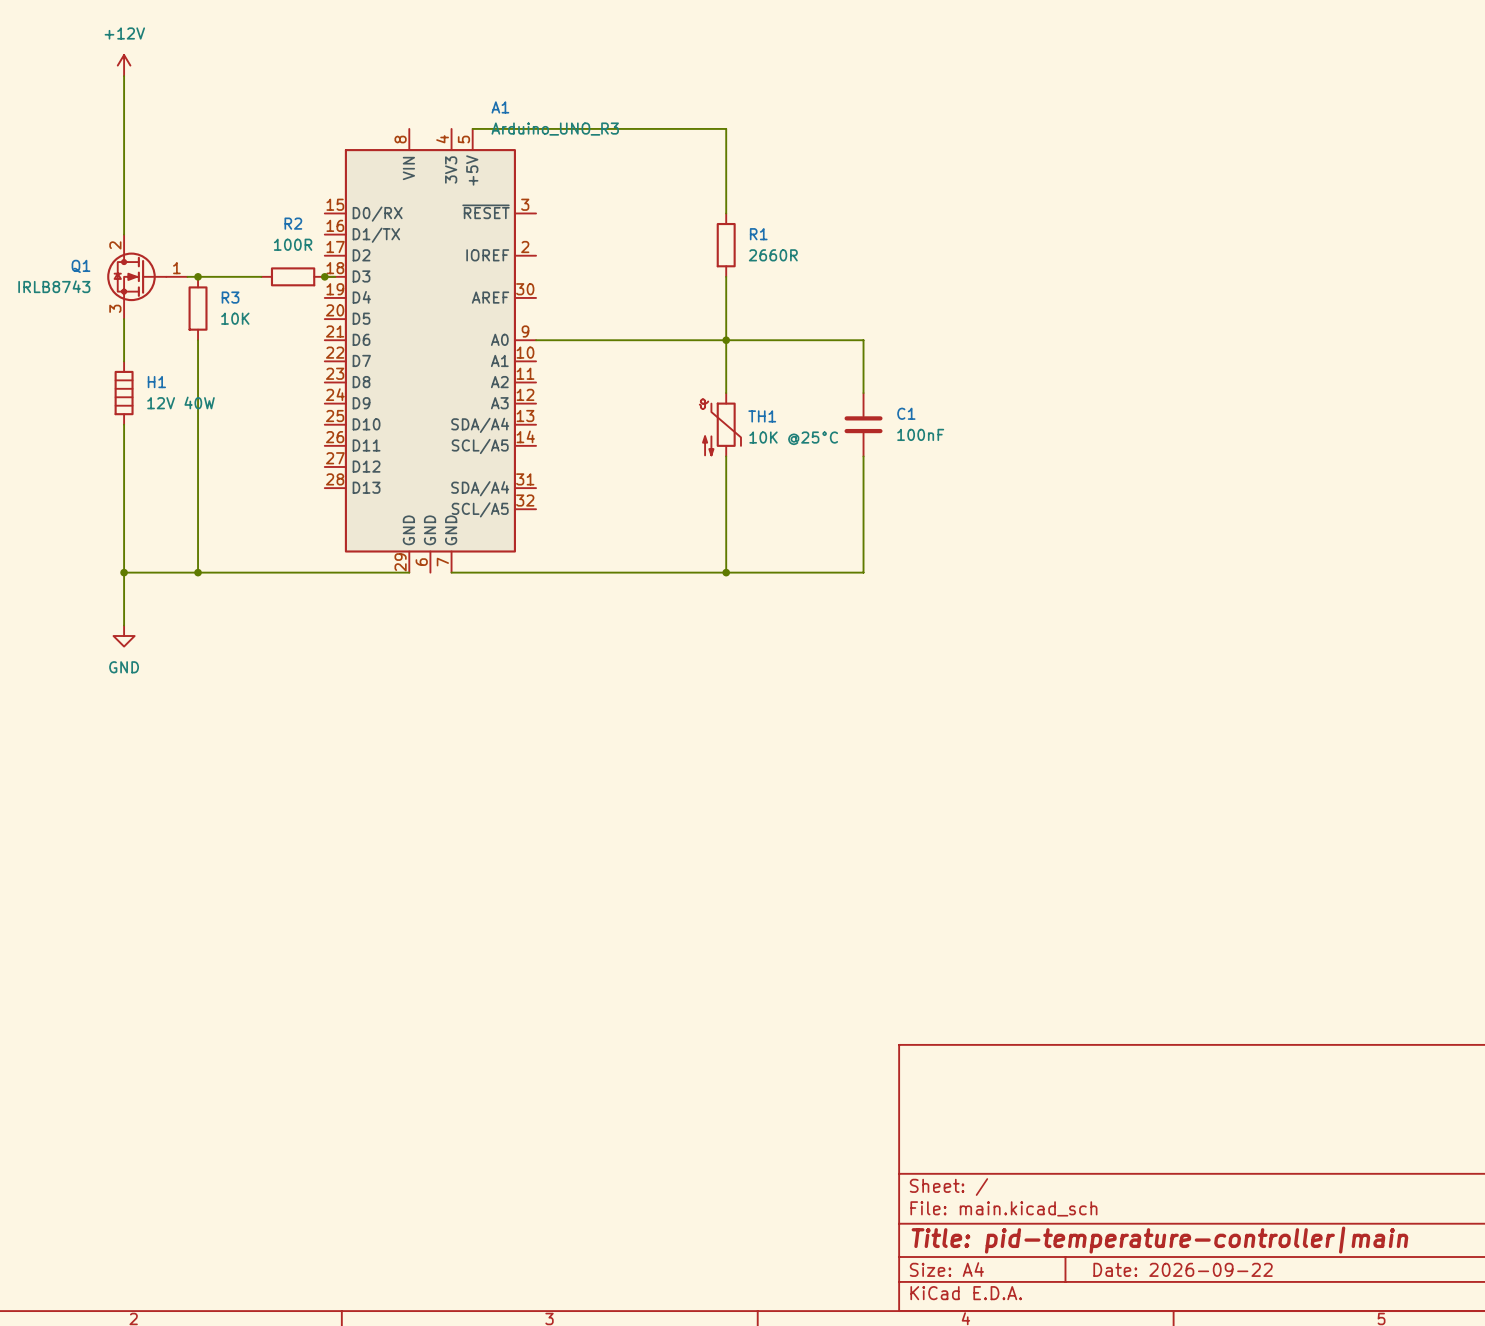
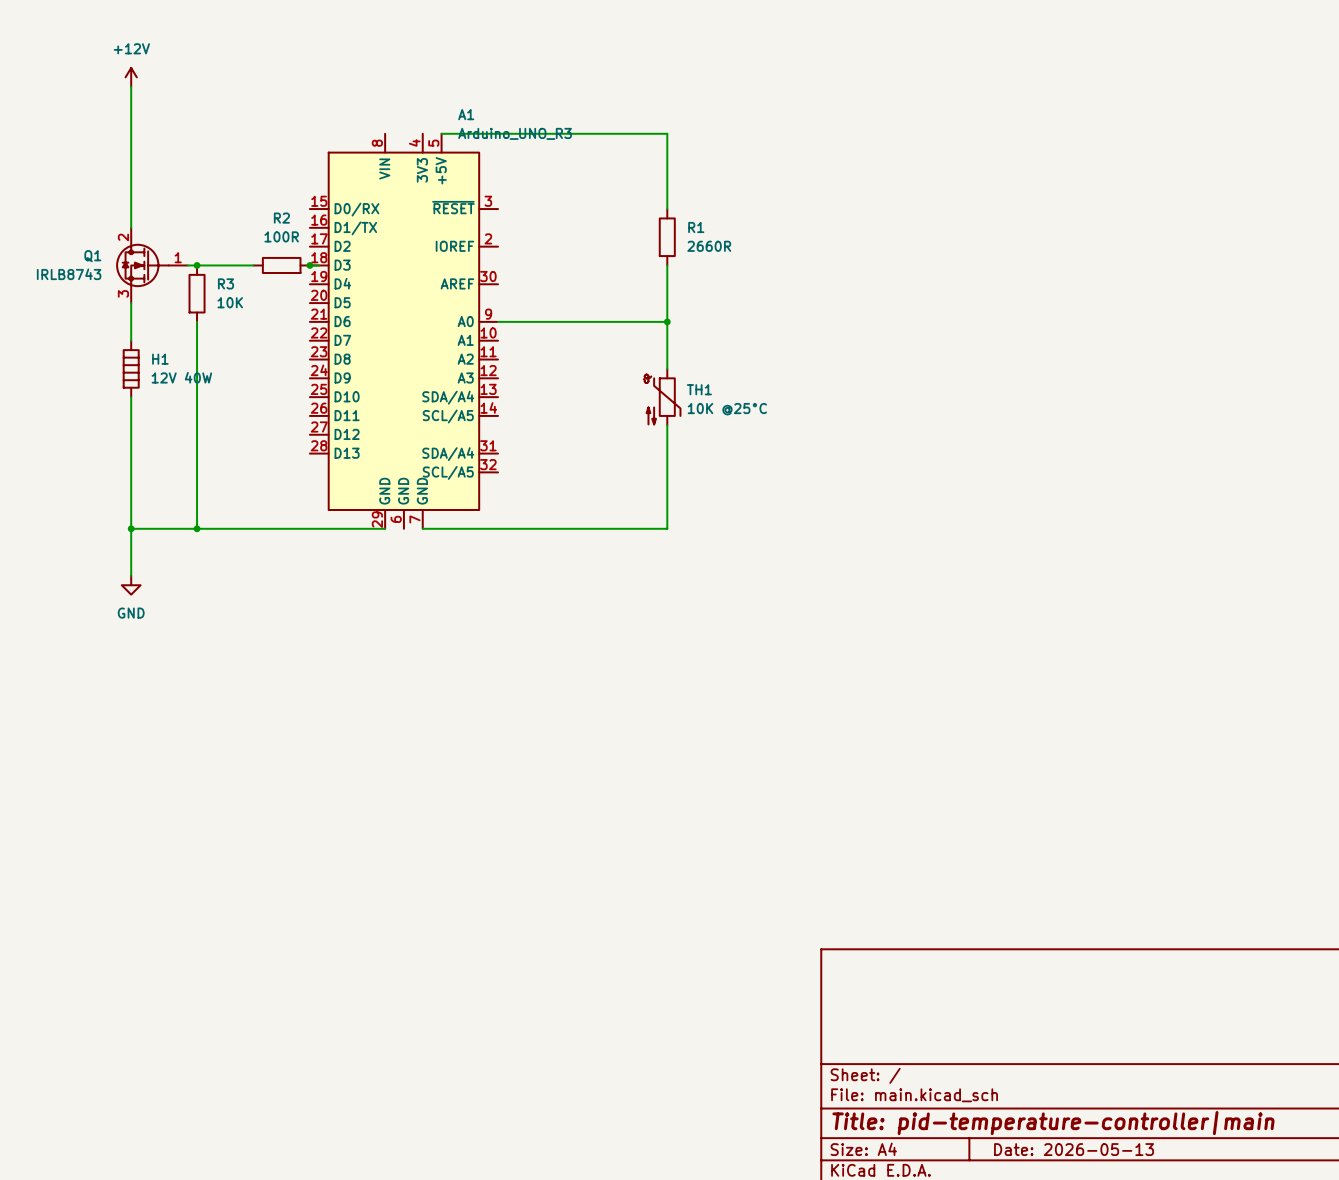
wire: (726, 340) (863, 340) (863, 393) -> none
C1: 100nF (863, 424) -> none
wire: (863, 456) (863, 572) (726, 572) -> none
junction: (726, 572) -> none
title block: Date: 2026-09-22 (1183, 1269) -> Date: 2026-05-13 (1074, 1149)

